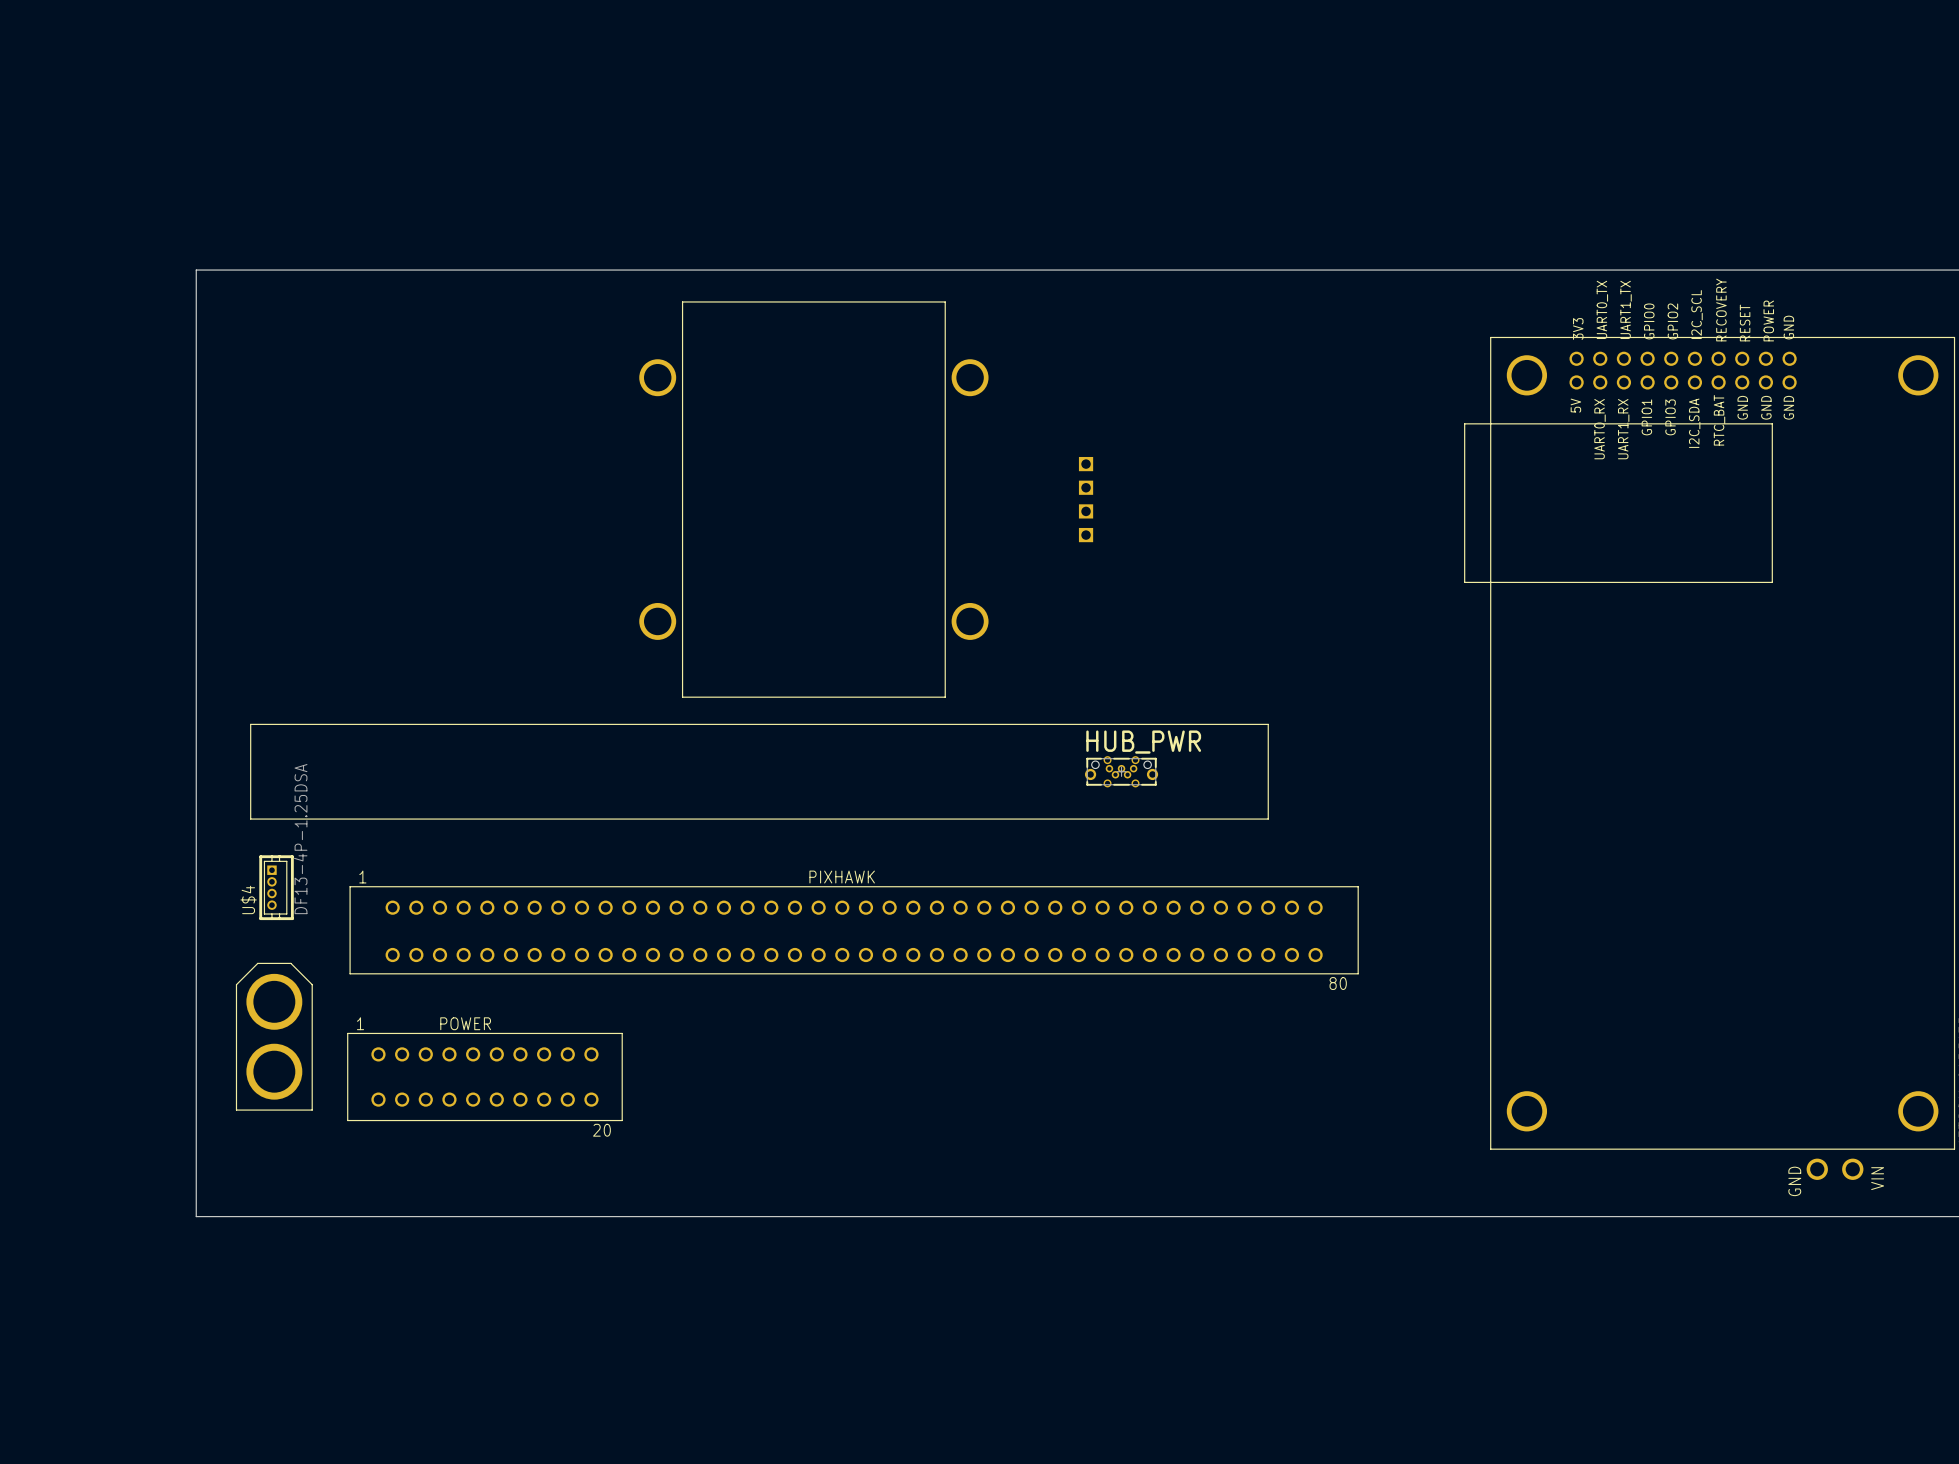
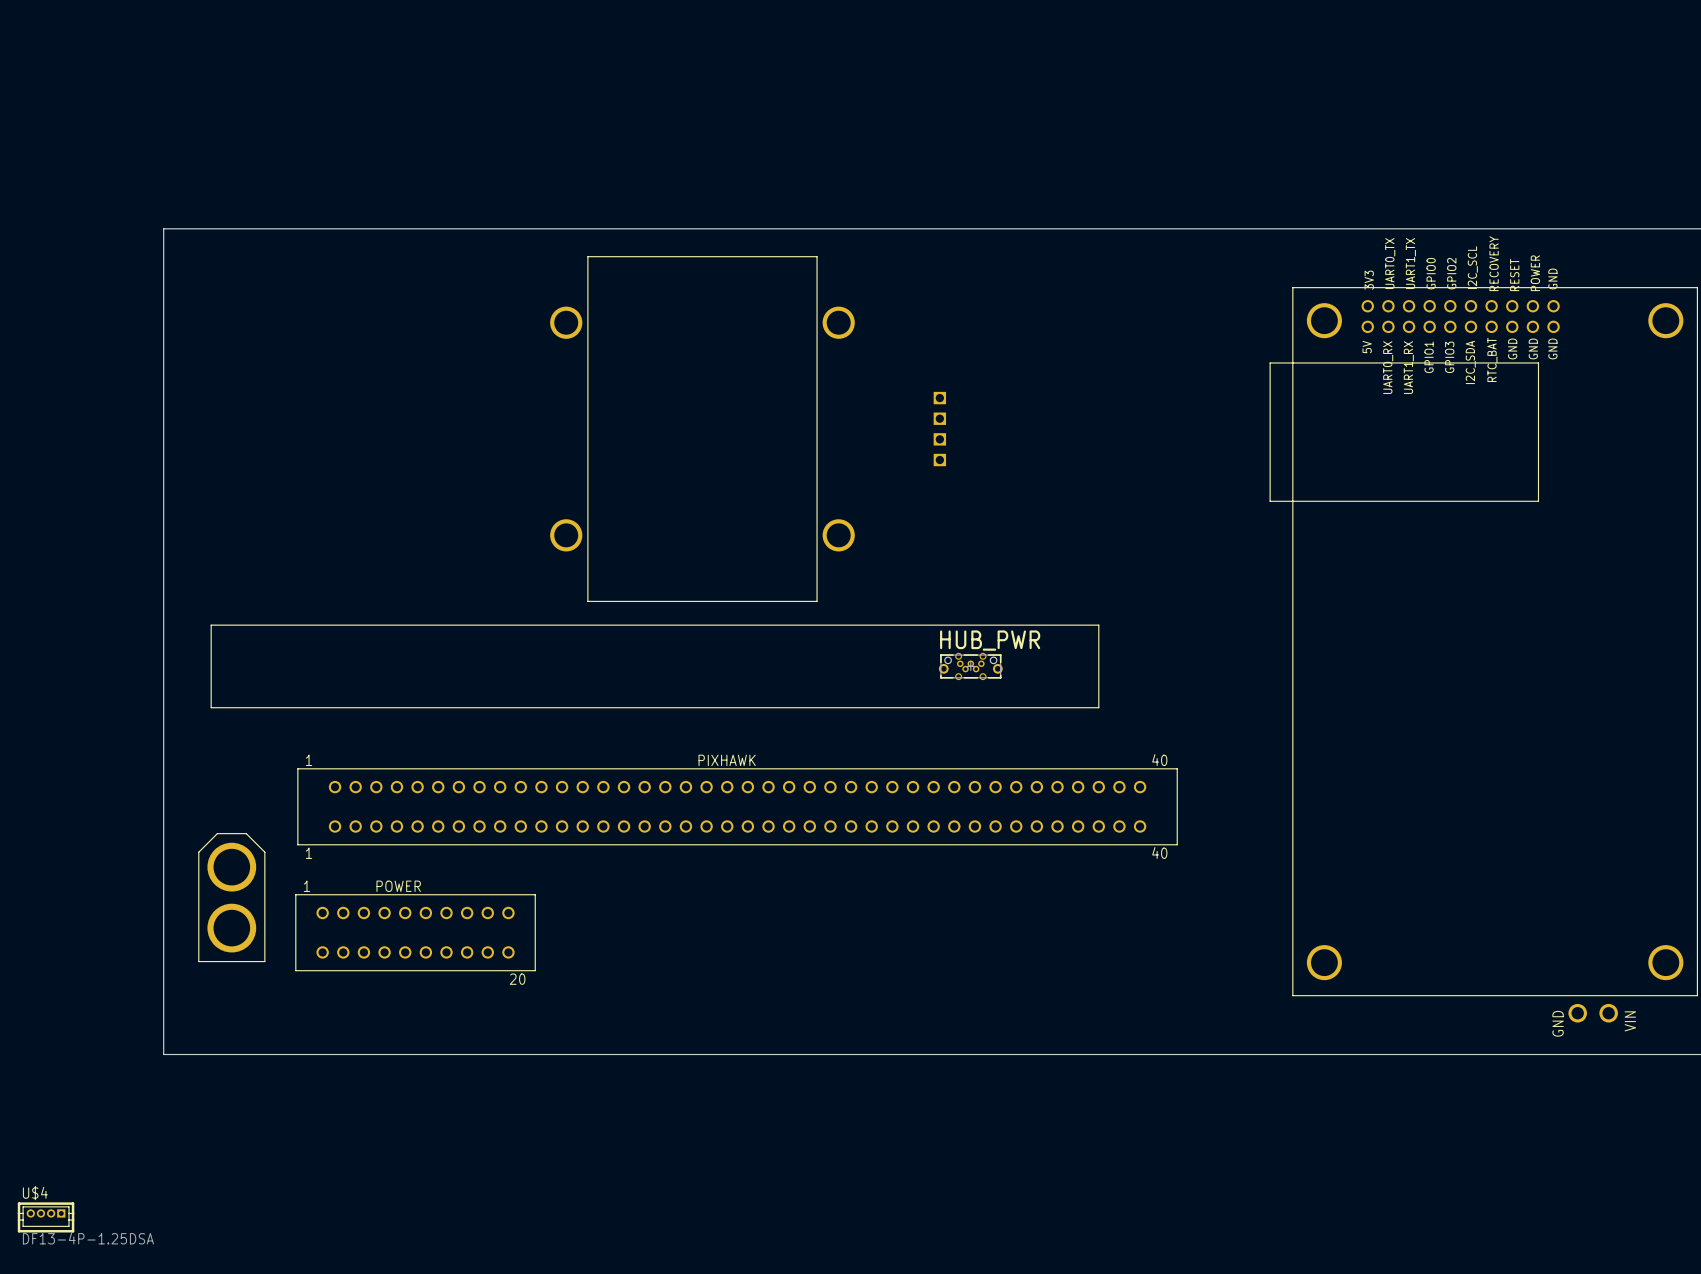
PIXHAWK footprint: [349, 886, 1359, 975] -> [297, 768, 1178, 846]
U$4 rotation: 0° (276, 887) -> 90° clockwise (46, 1217)
U$4 position: (276, 887) -> (46, 1217)

